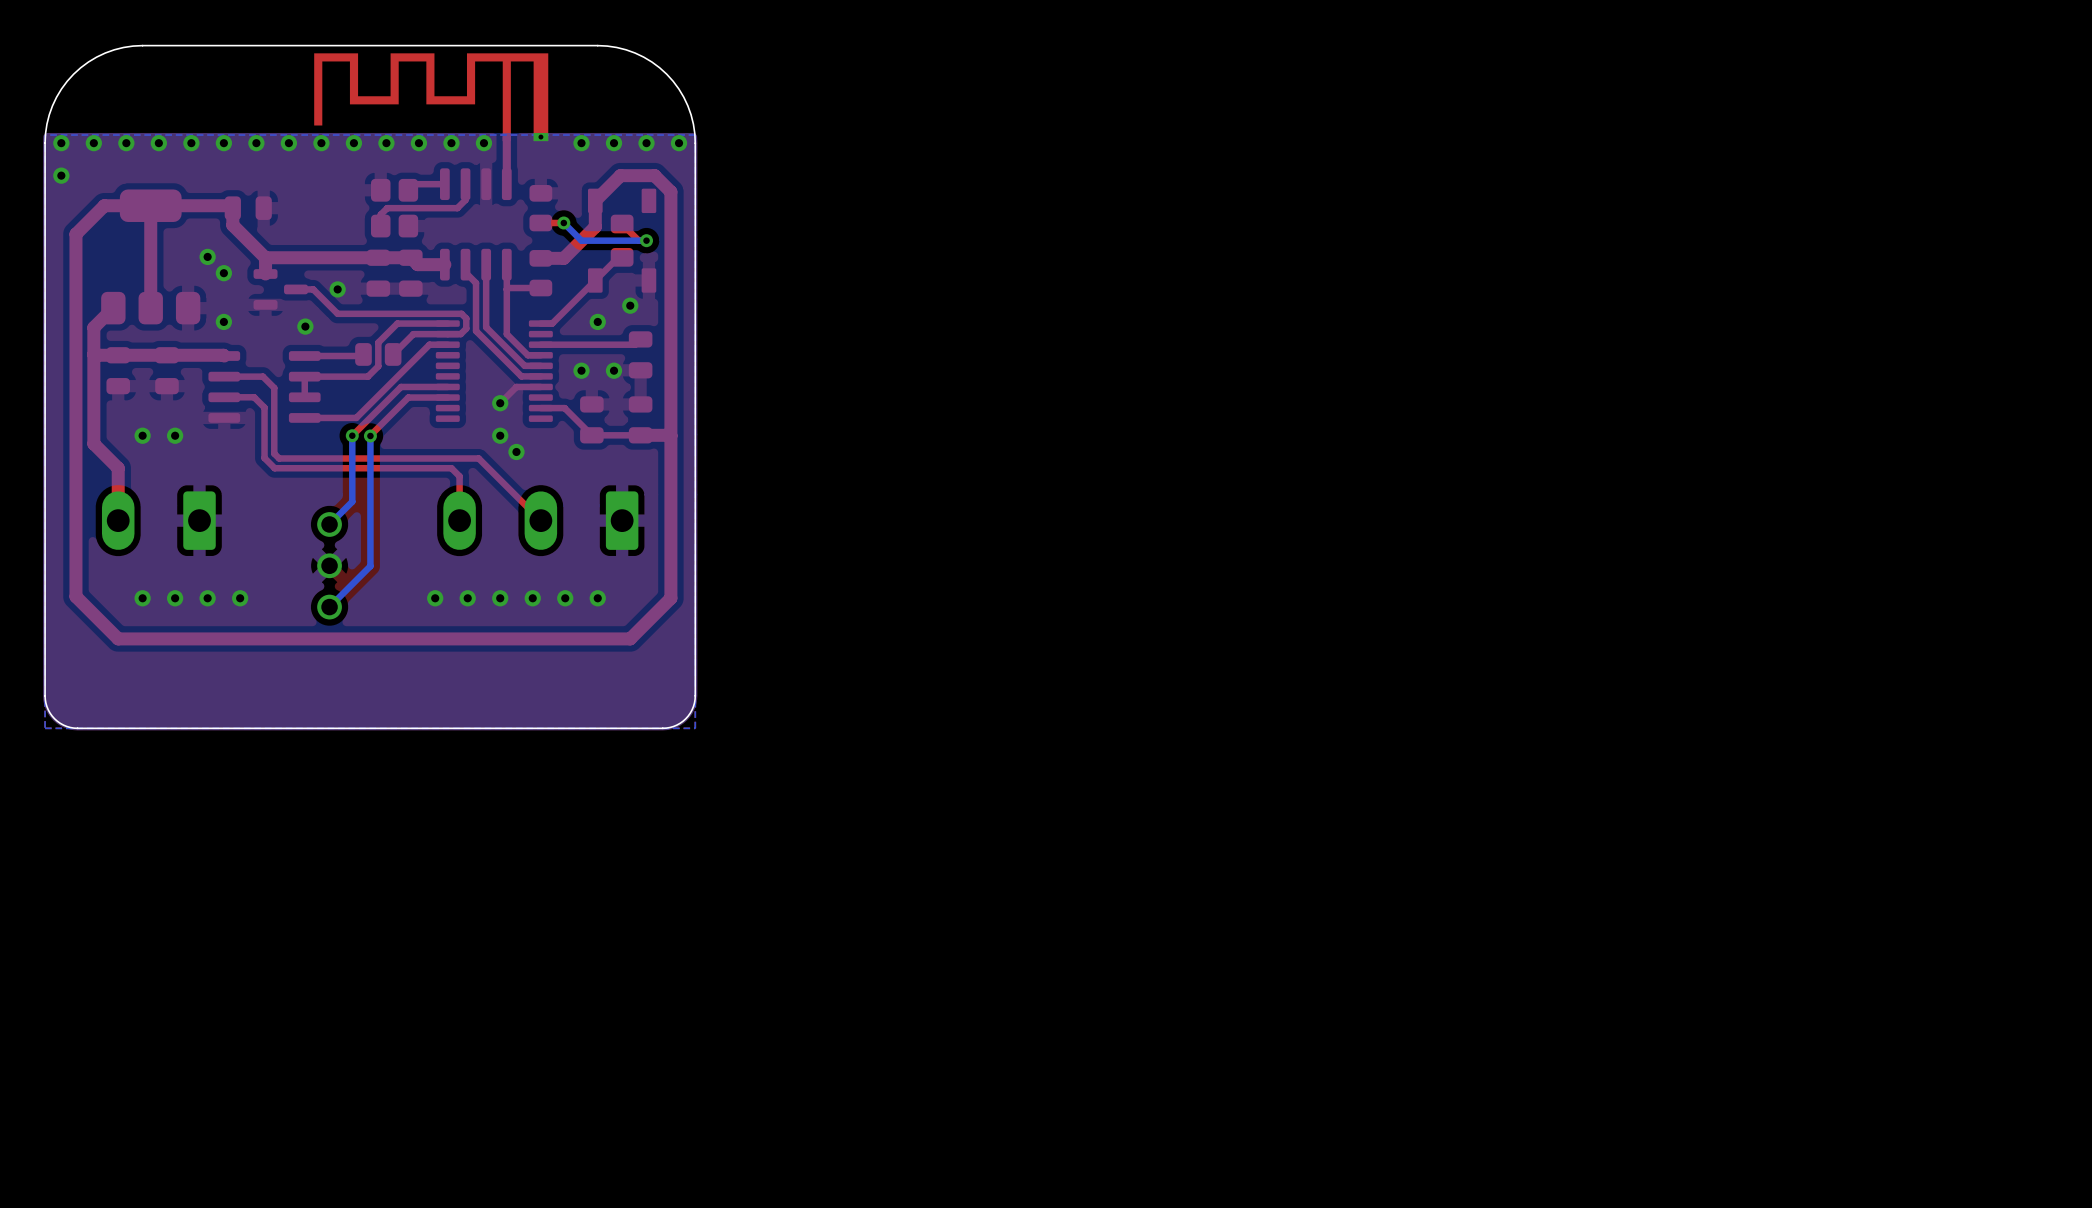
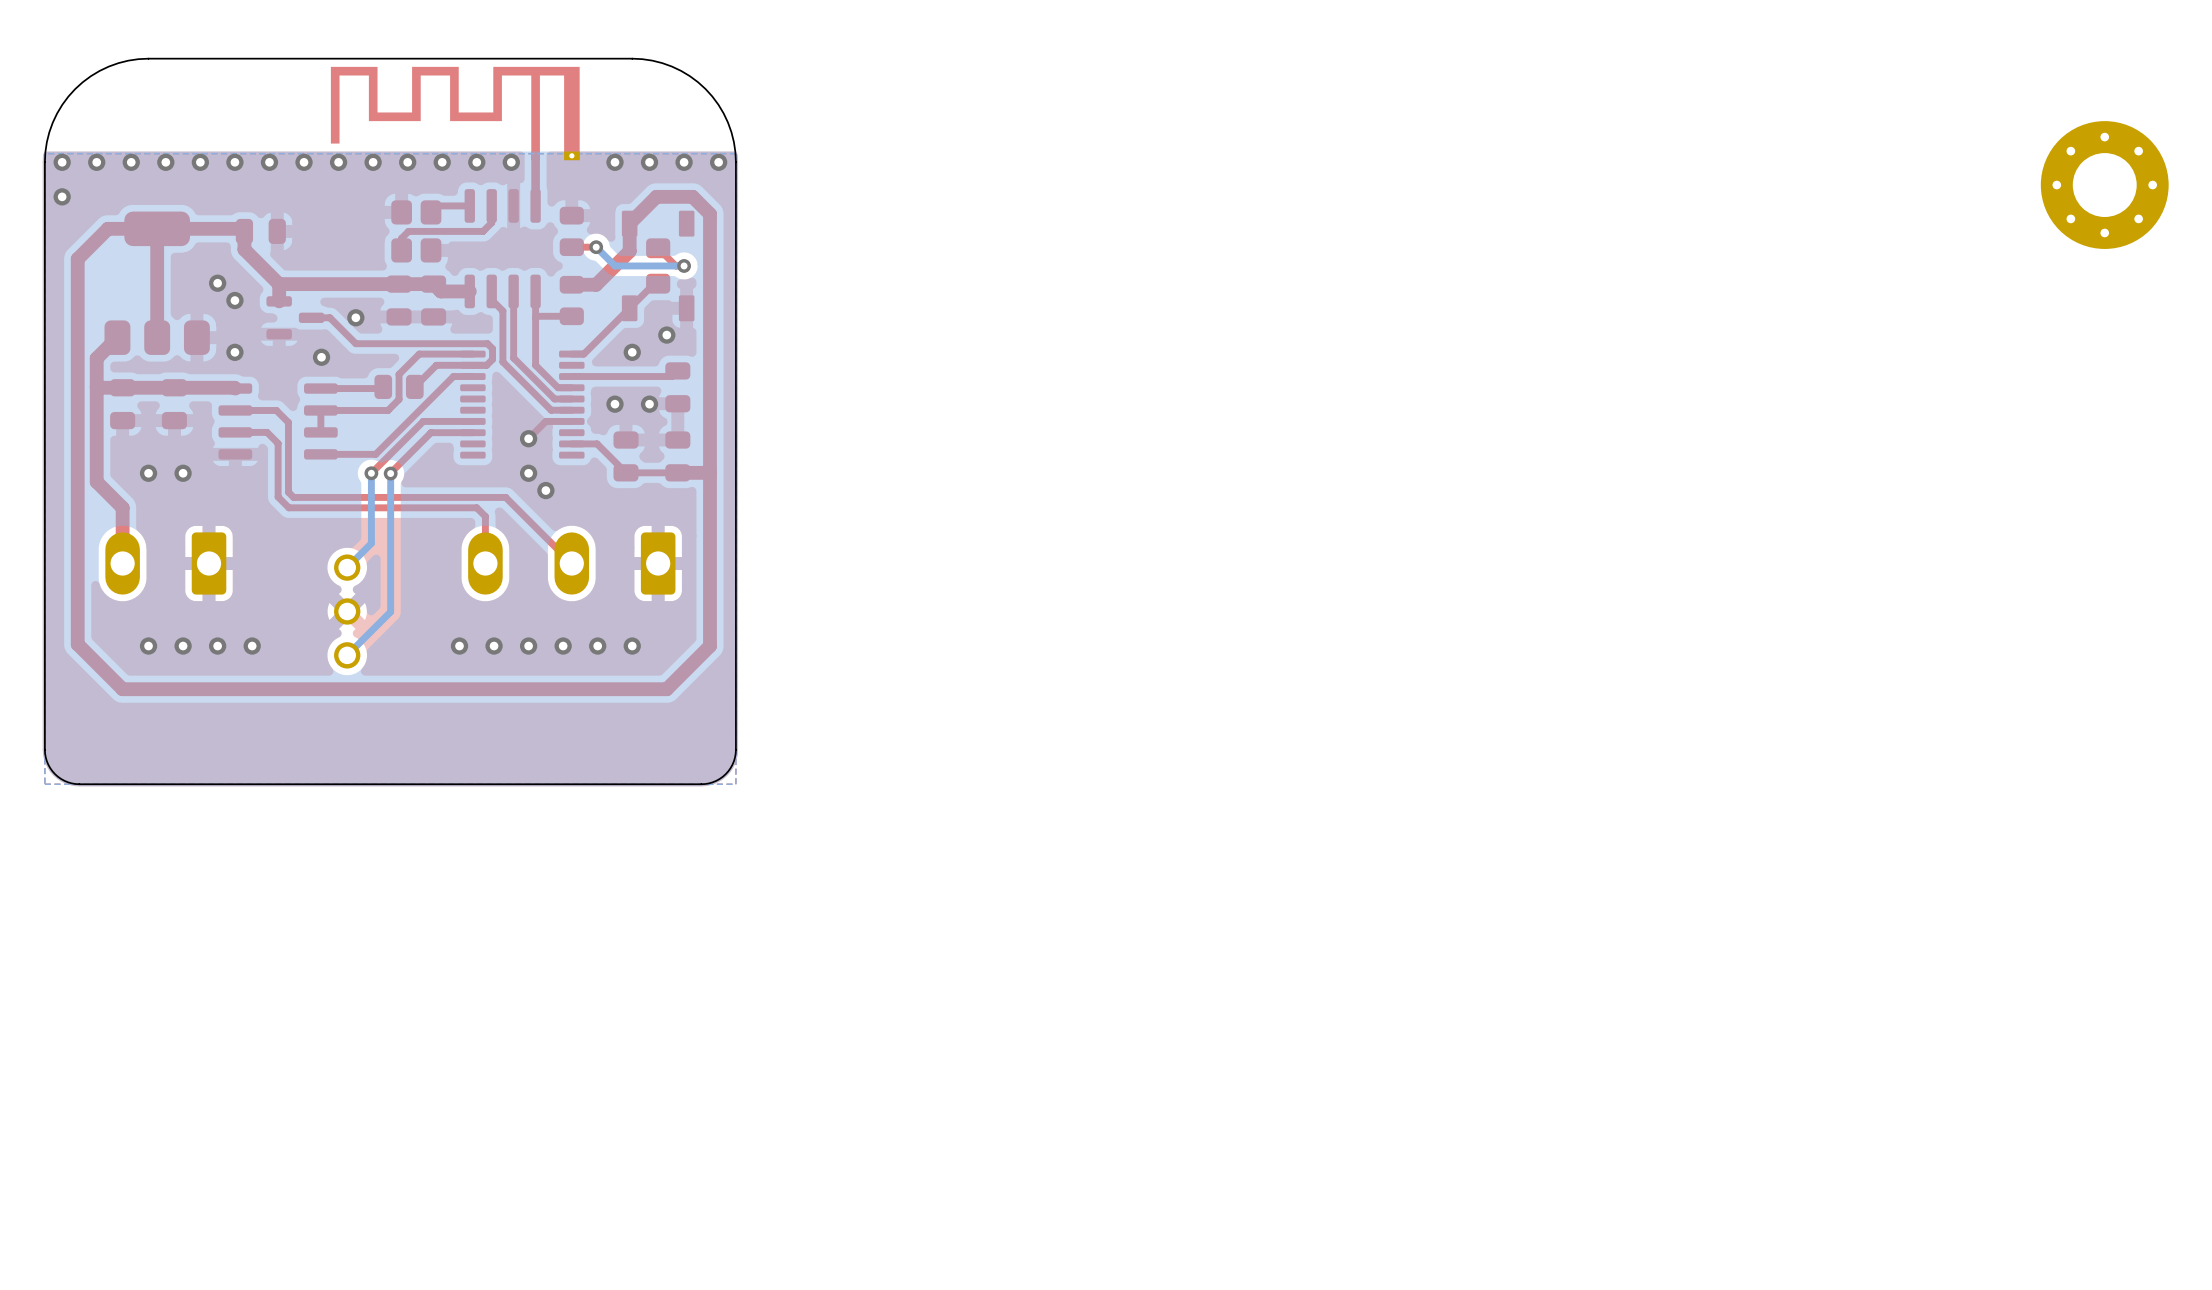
part: none -> (2104, 185)

